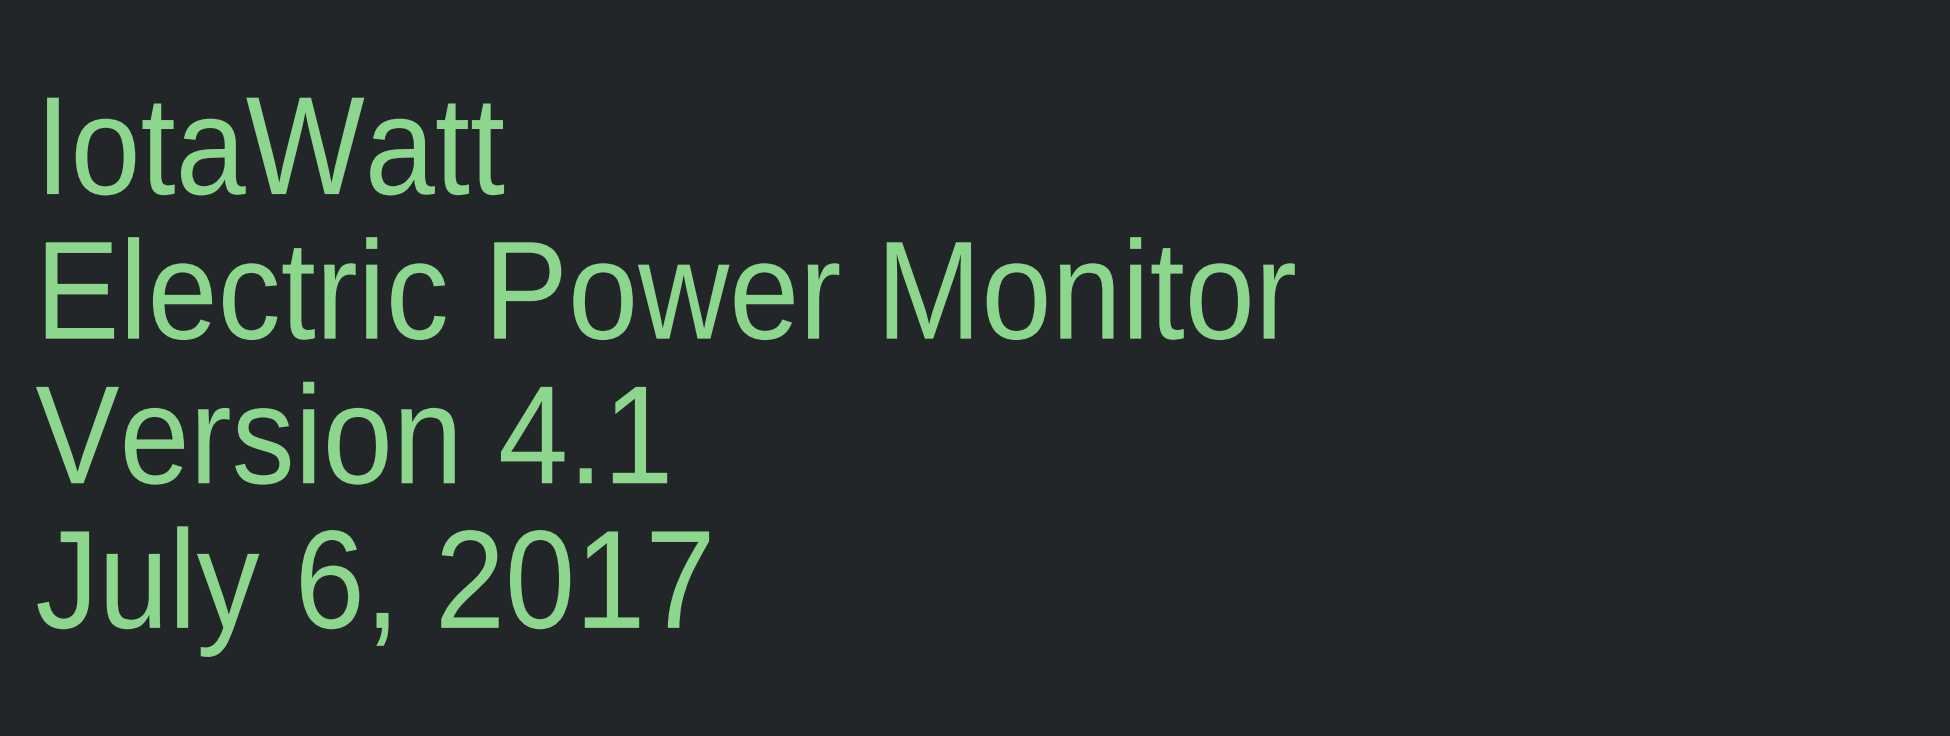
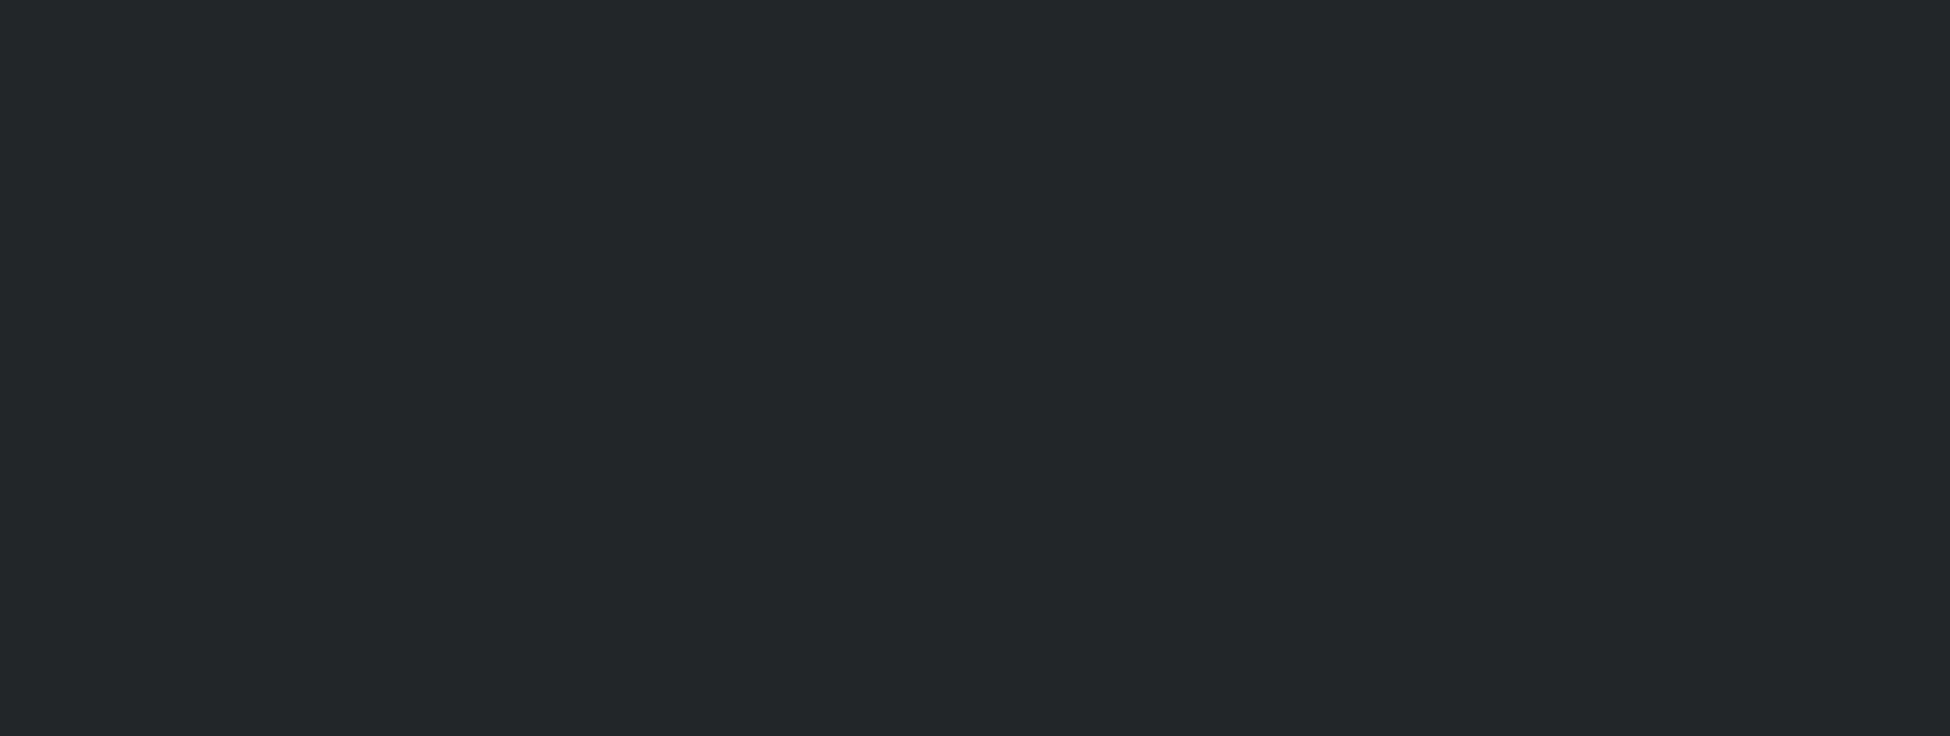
text: IotaWatt (275, 146) -> none
text: Electric Power Monitor (670, 288) -> none
text: Version 4.1 (351, 433) -> none
text: July 6, 2017 (373, 591) -> none

